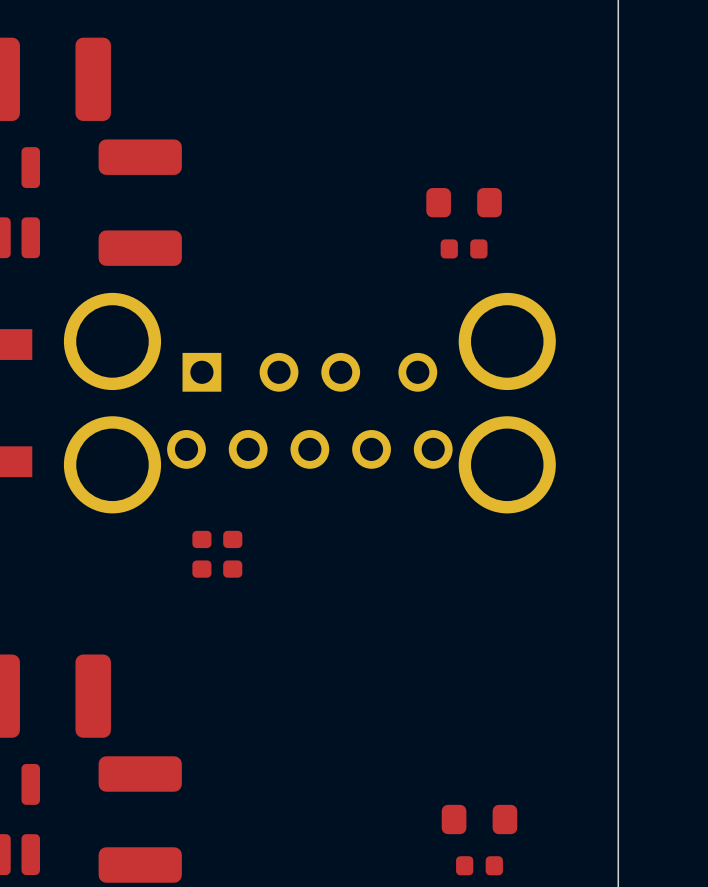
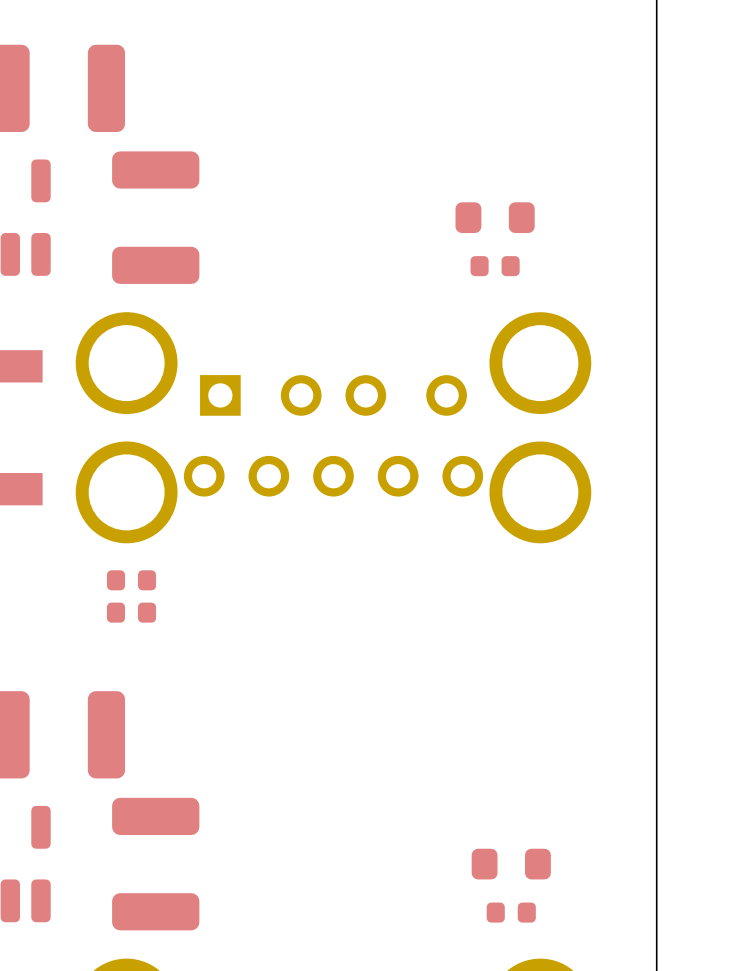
part: none -> (131, 580)
part: (201, 554) -> none
part: (232, 554) -> none
part: none -> (131, 612)

